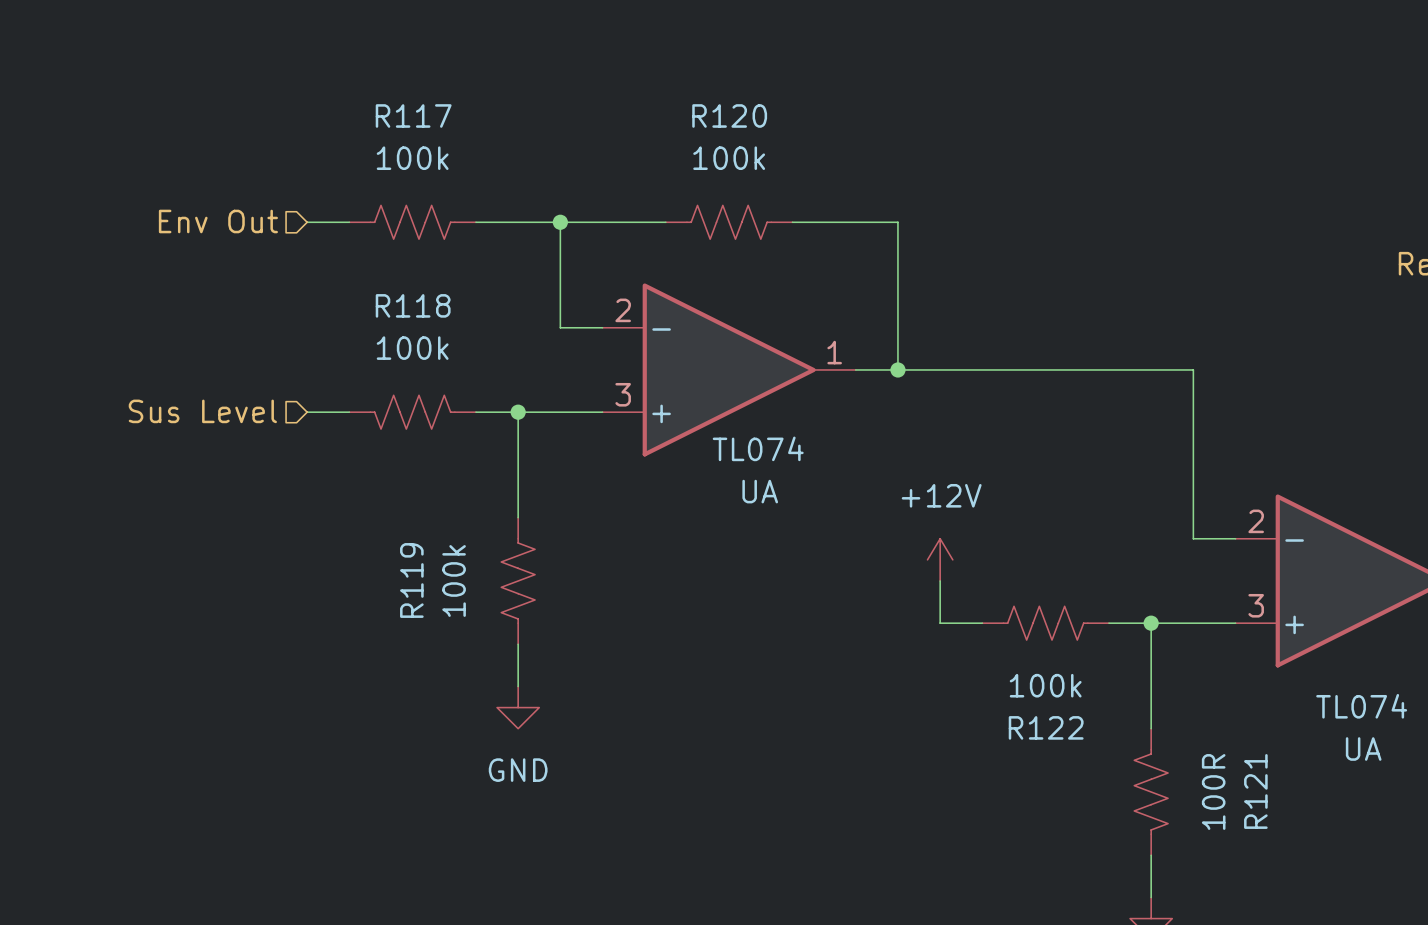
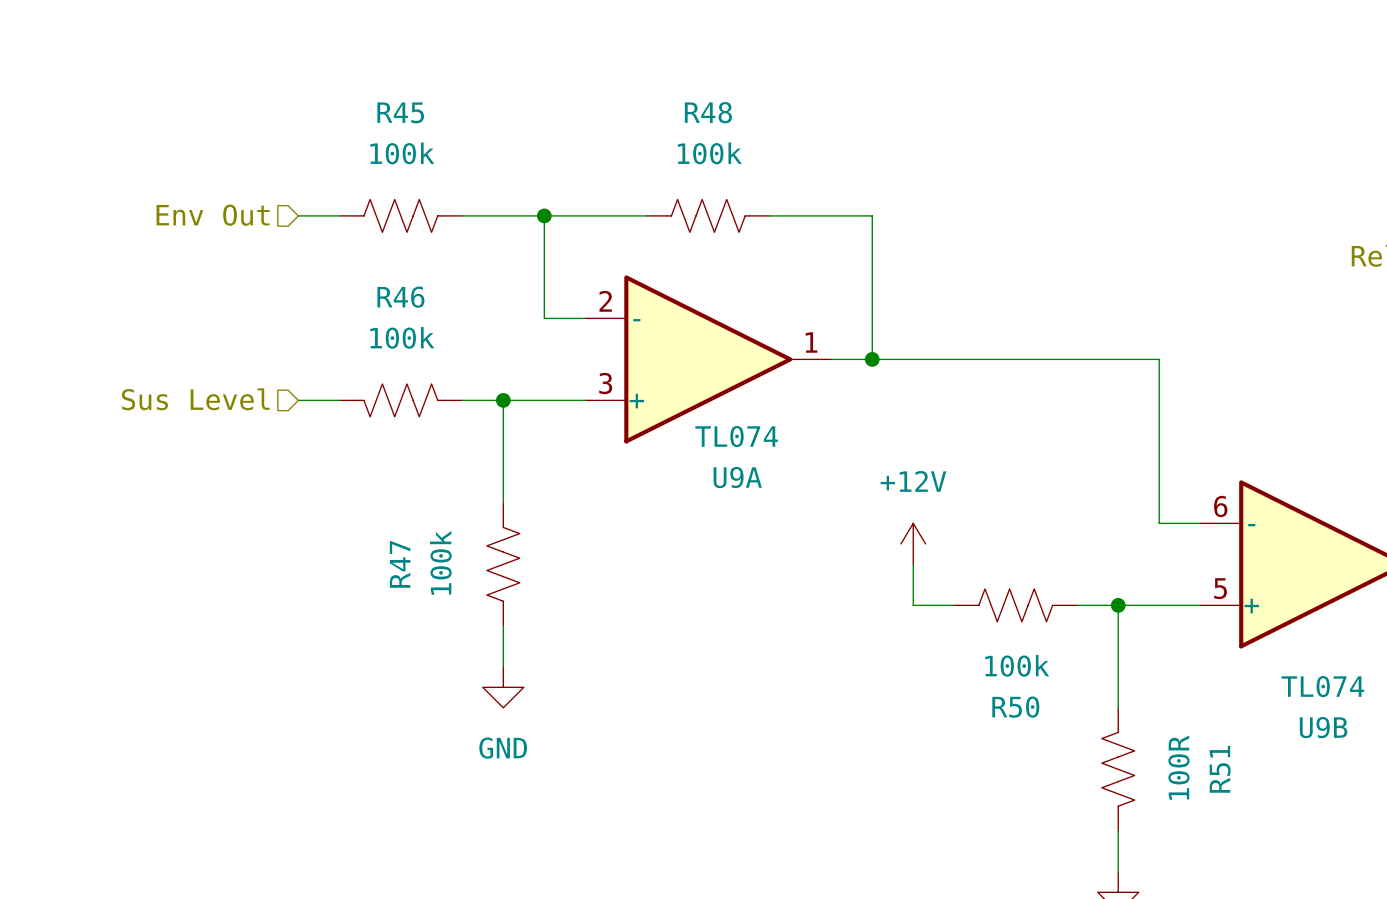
R117 name: R117 (413, 115) -> R45 (400, 112)
R120 name: R120 (729, 115) -> R48 (708, 112)
R118 name: R118 (413, 305) -> R46 (400, 297)
UA name: UA (760, 491) -> U9A (737, 477)
UA pin number: 2 (1256, 521) -> 6 (1220, 506)
R119 name: R119 (411, 580) -> R47 (400, 564)
UA pin number: 3 (1256, 605) -> 5 (1220, 588)
R122 name: R122 (1046, 727) -> R50 (1015, 707)
UA name: UA (1363, 749) -> U9B (1323, 727)
R121 name: R121 (1255, 791) -> R51 (1220, 769)

